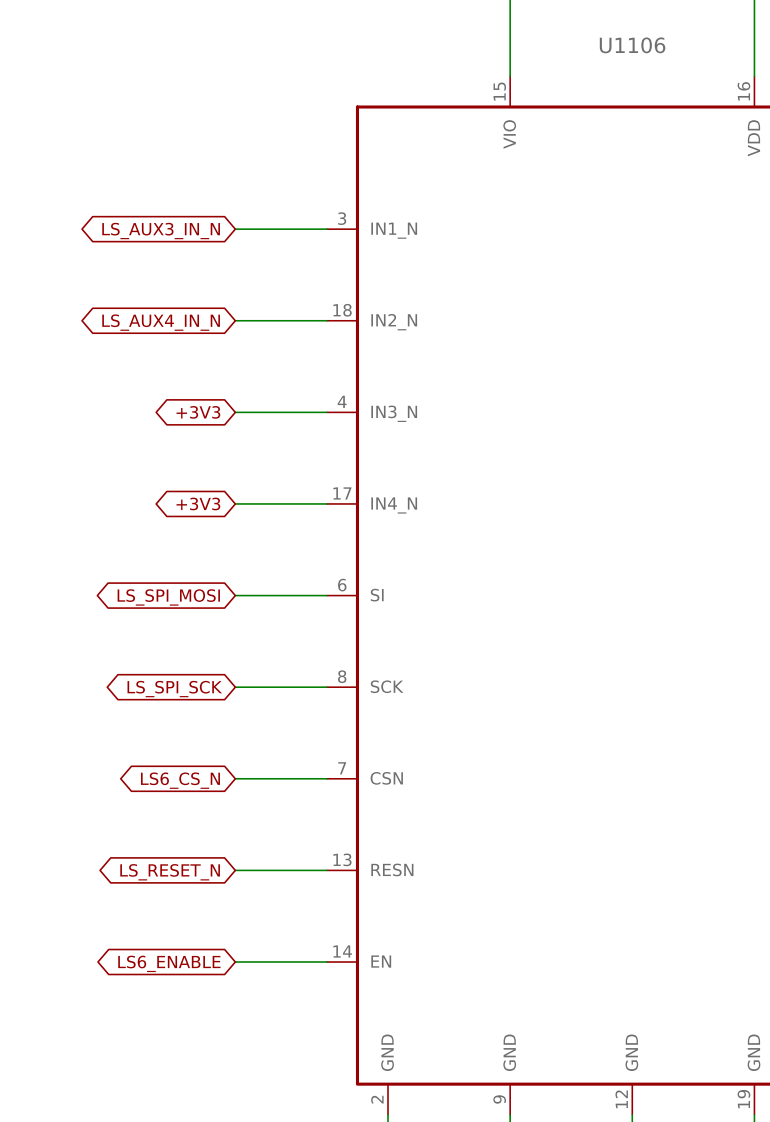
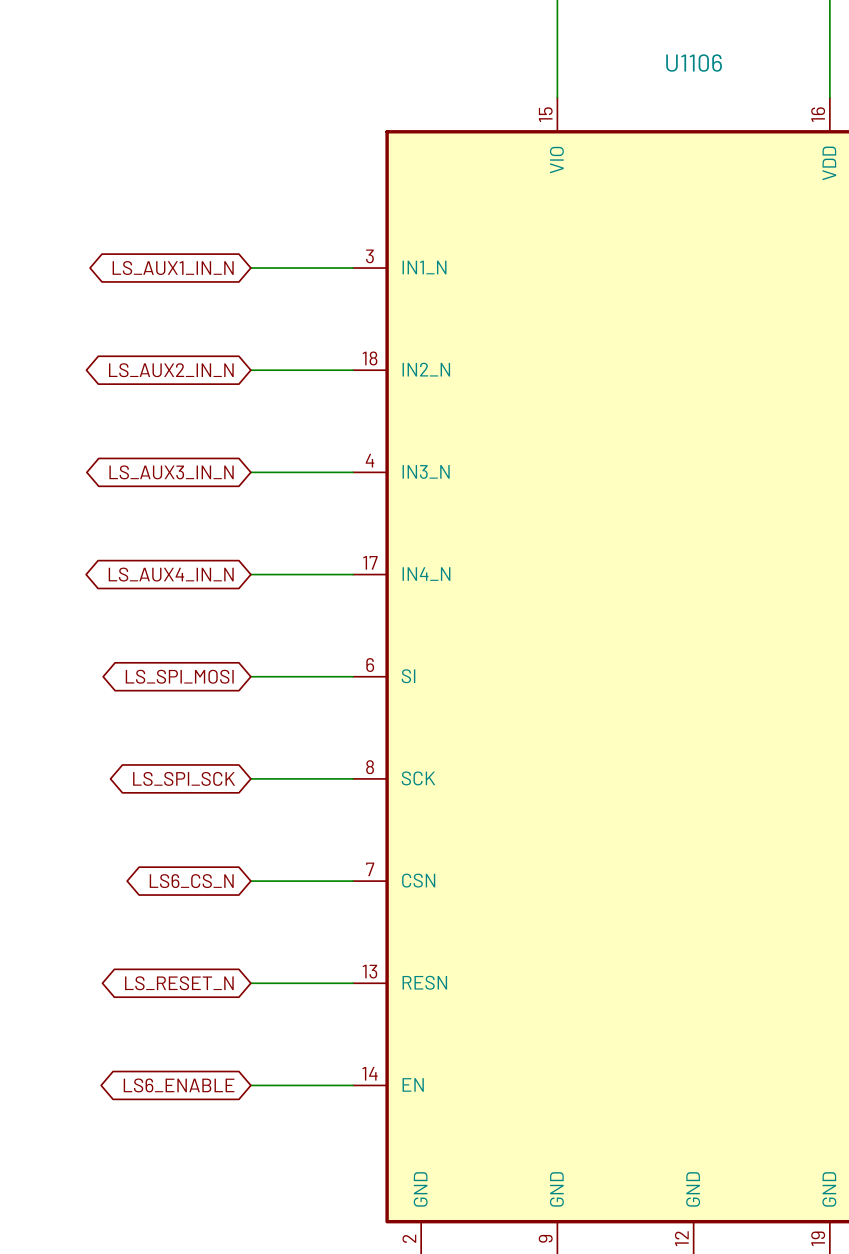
global label: LS_AUX3_IN_N (161, 231) -> LS_AUX1_IN_N (173, 268)
global label: LS_AUX4_IN_N (161, 322) -> LS_AUX2_IN_N (171, 370)
global label: +3V3 (198, 412) -> LS_AUX3_IN_N (171, 472)
global label: +3V3 (198, 503) -> LS_AUX4_IN_N (171, 574)

